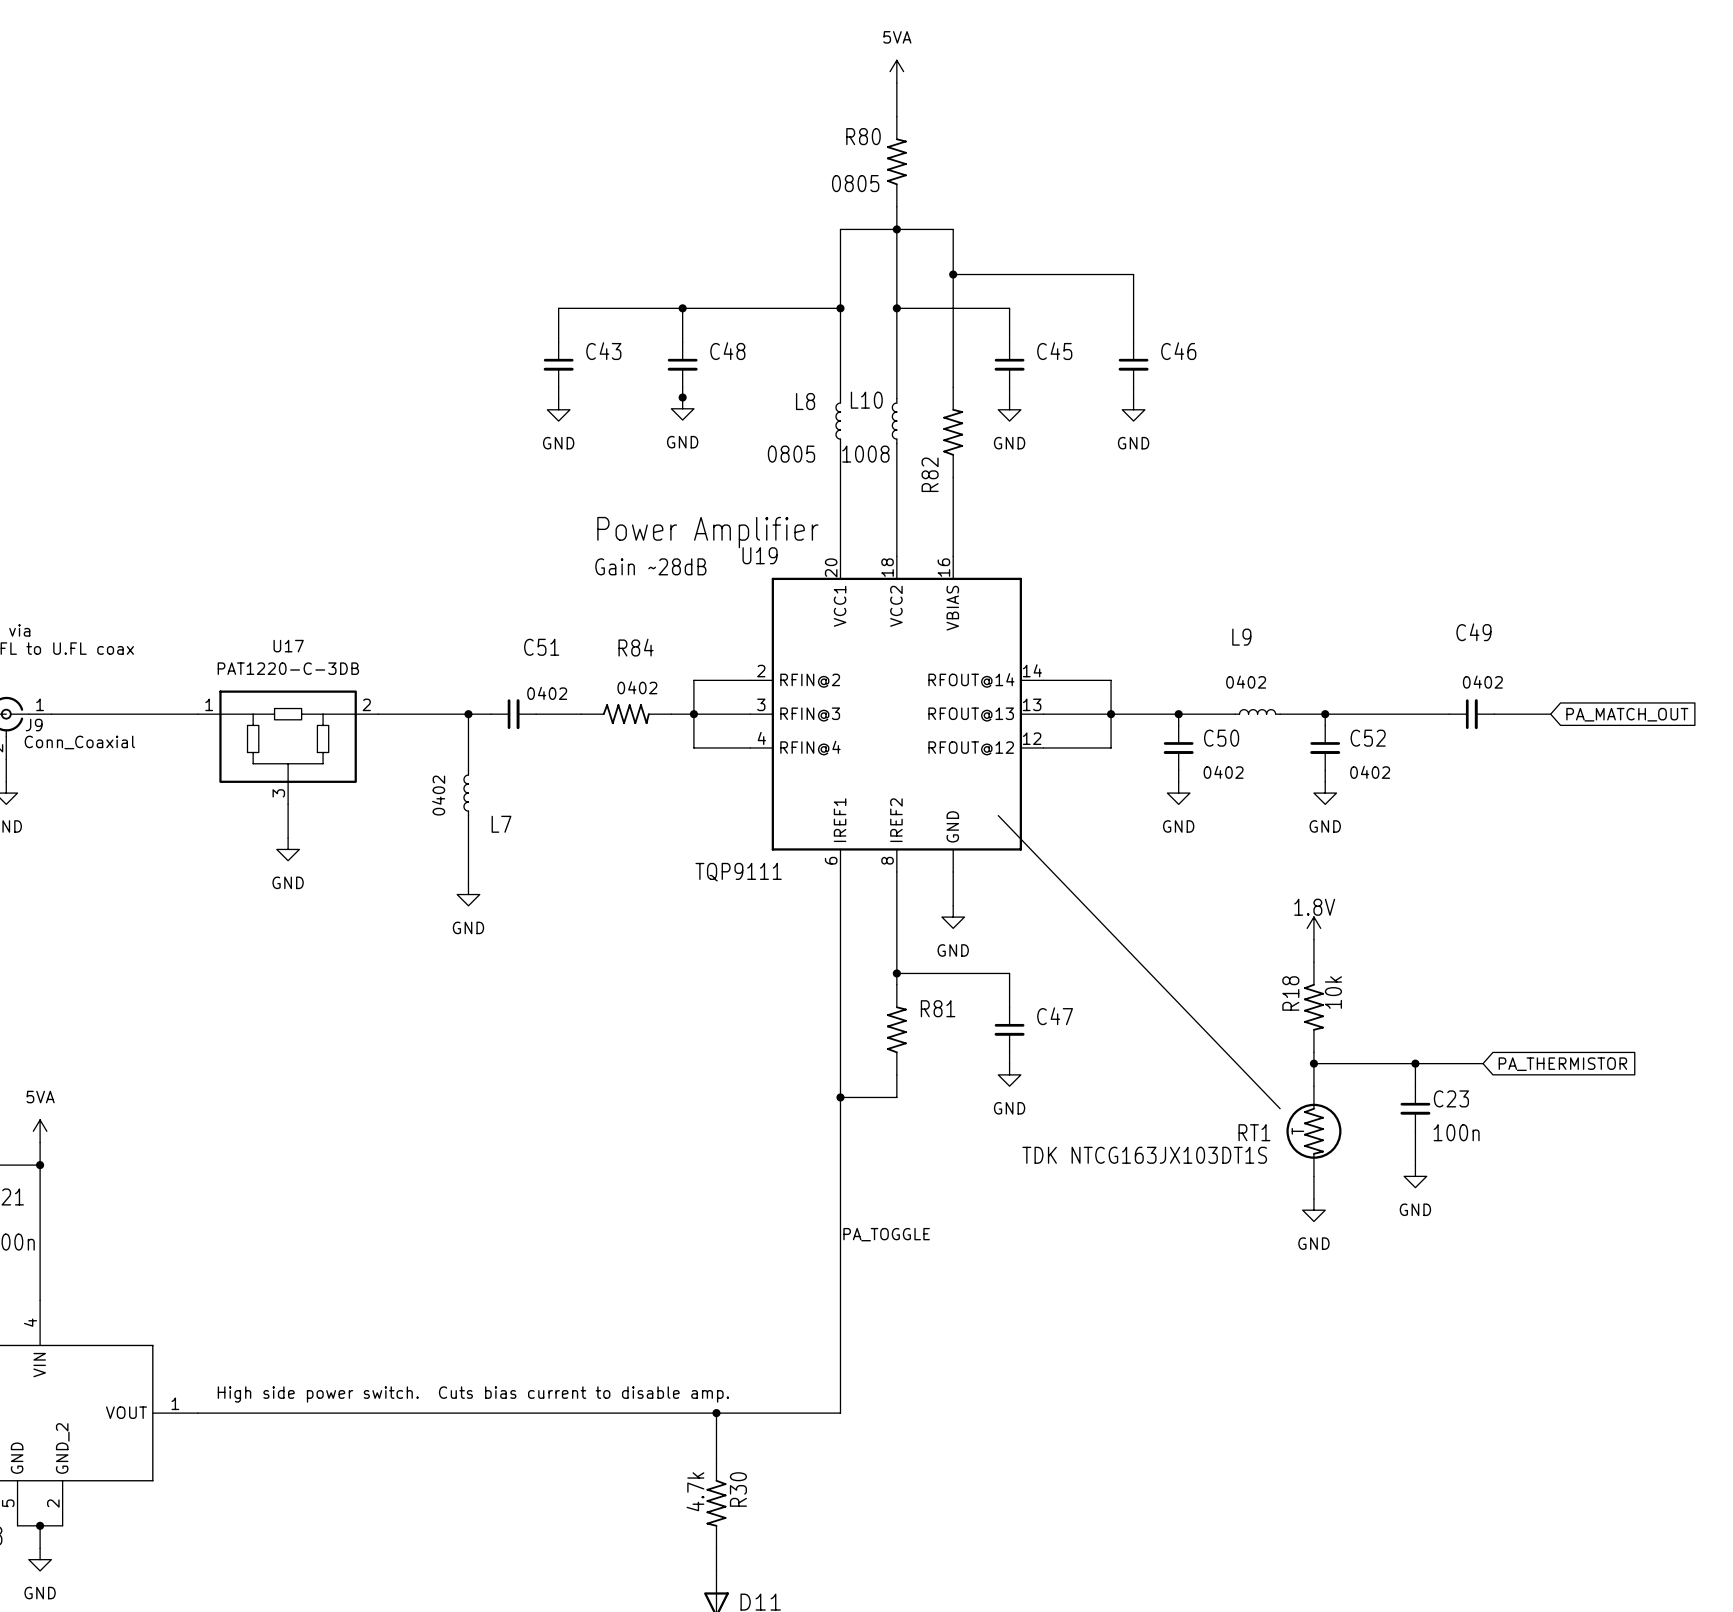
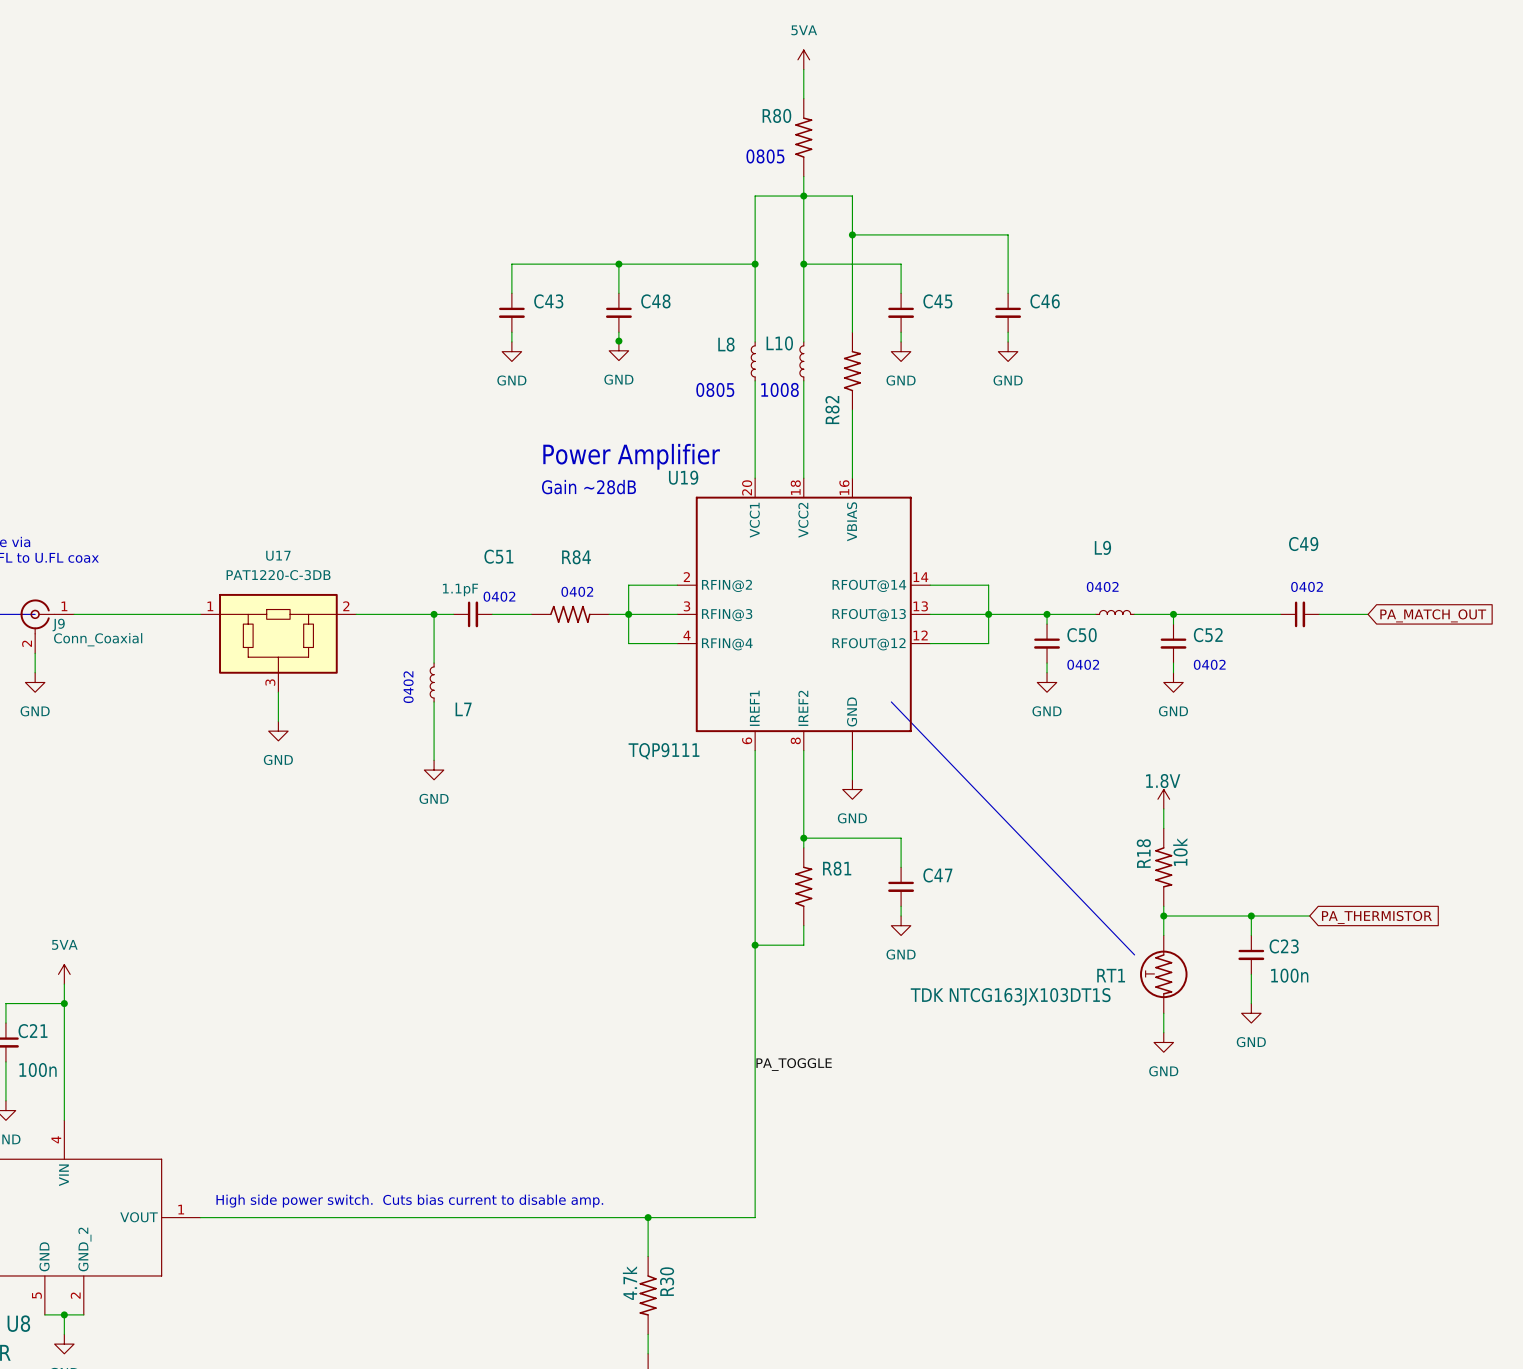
C51 value: none -> 1.1pF (460, 589)

